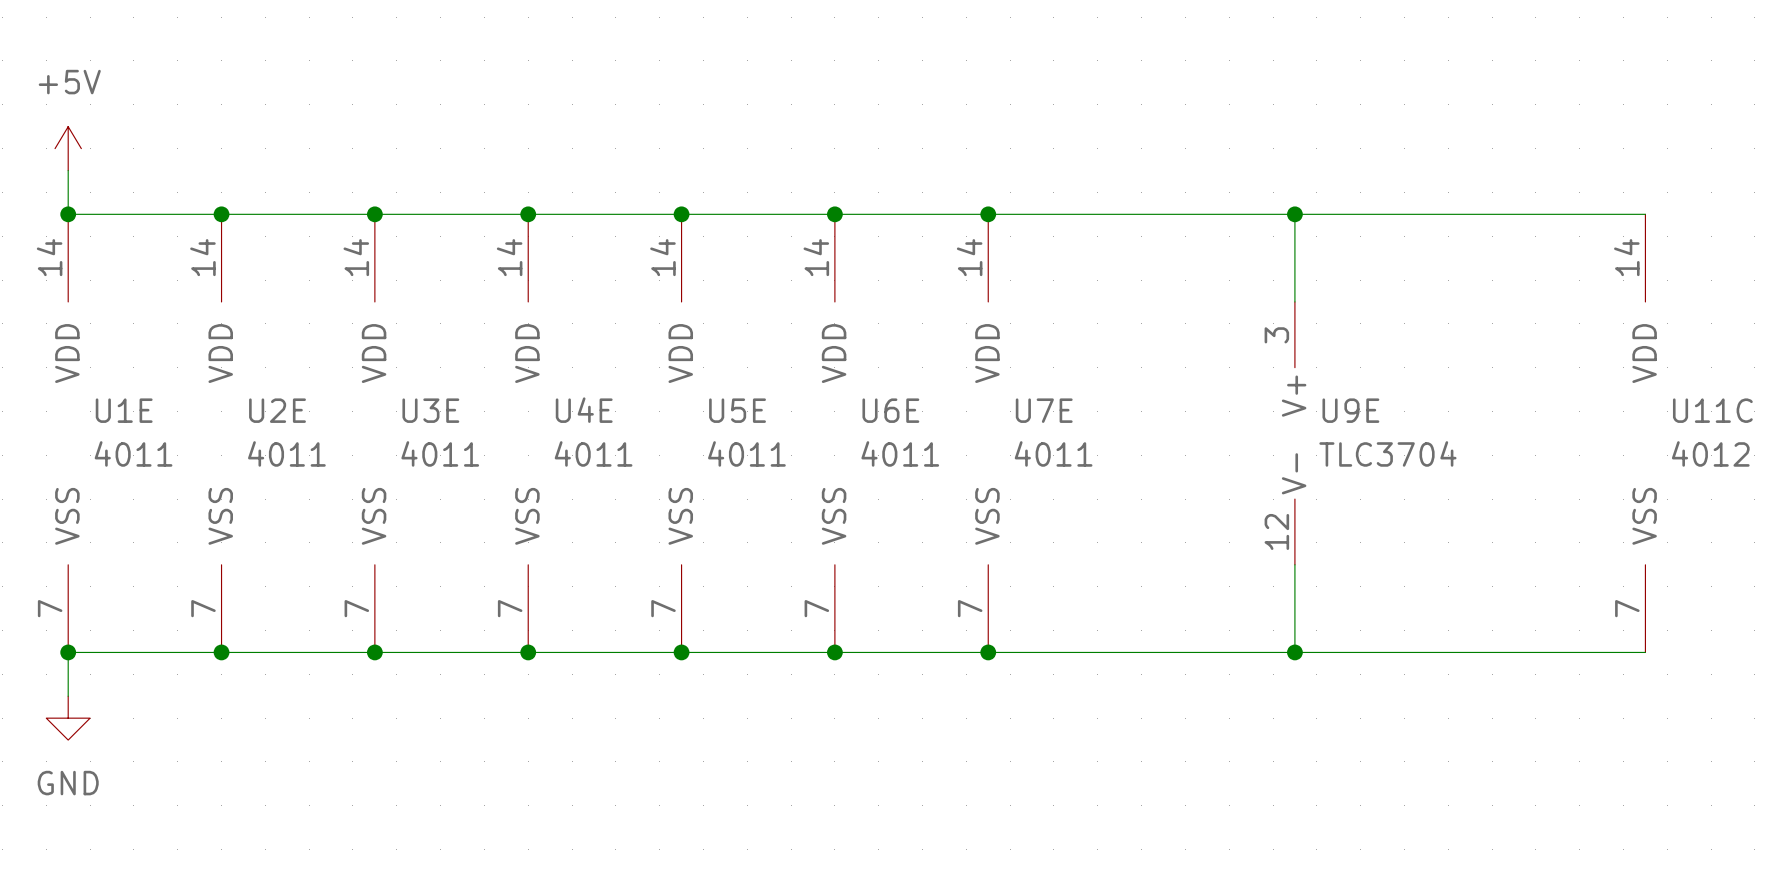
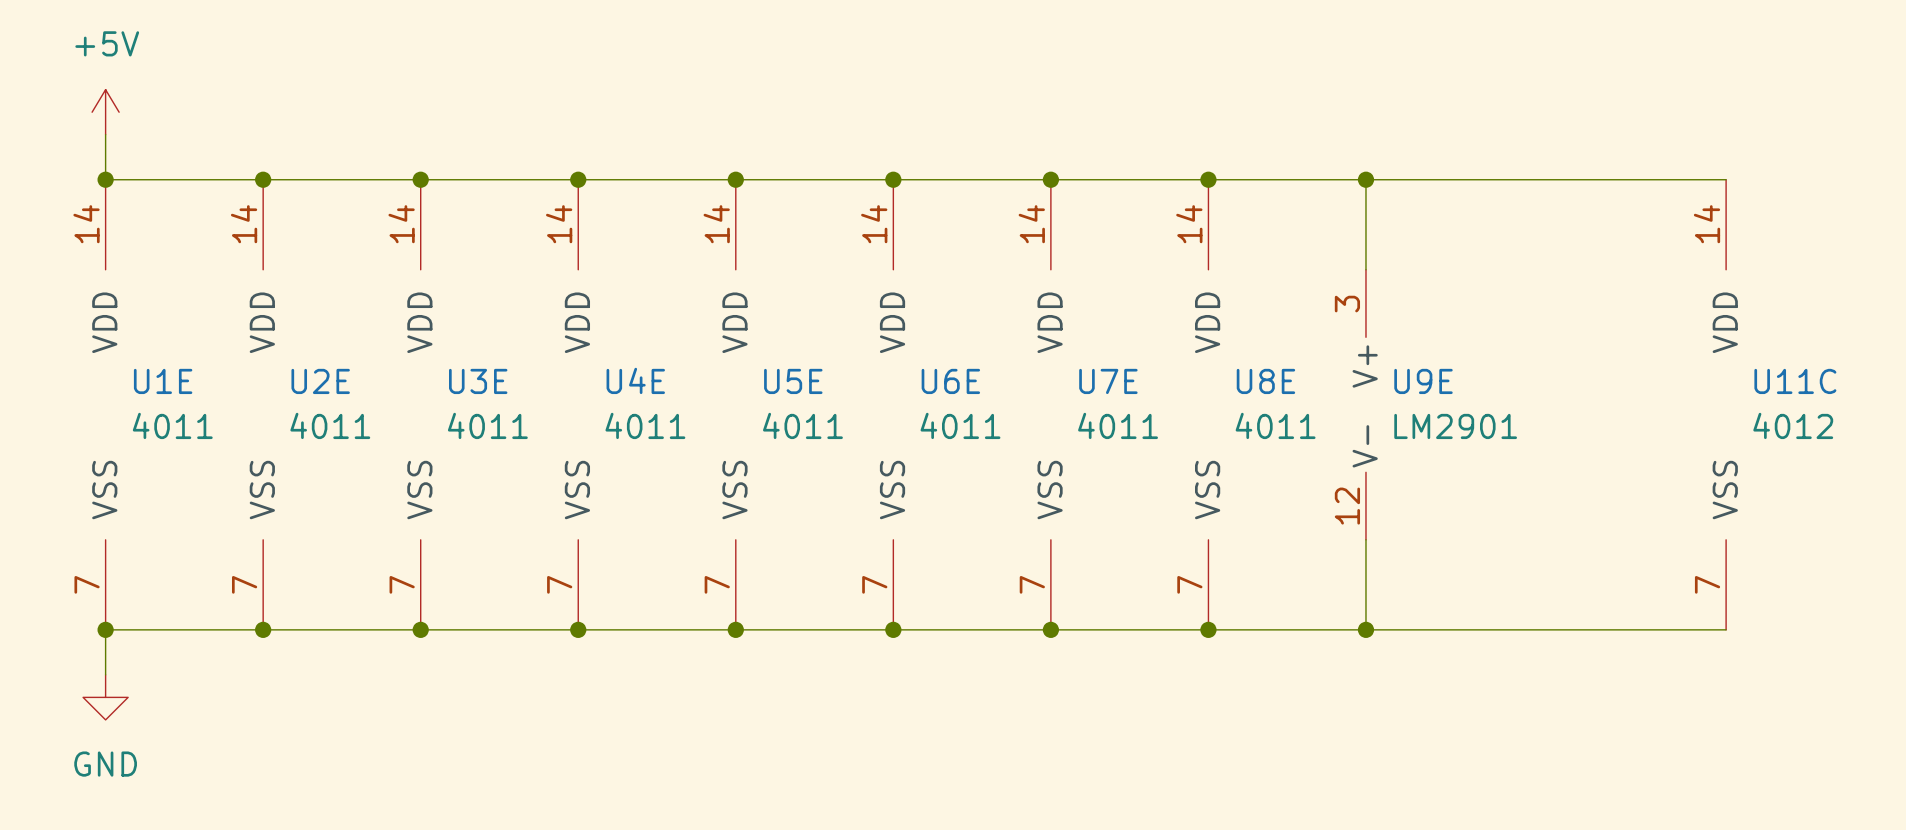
junction: none -> (1208, 179)
U8E: none -> 4011 (1208, 404)
U9E value: TLC3704 (1387, 453) -> LM2901 (1455, 426)
junction: none -> (1208, 629)

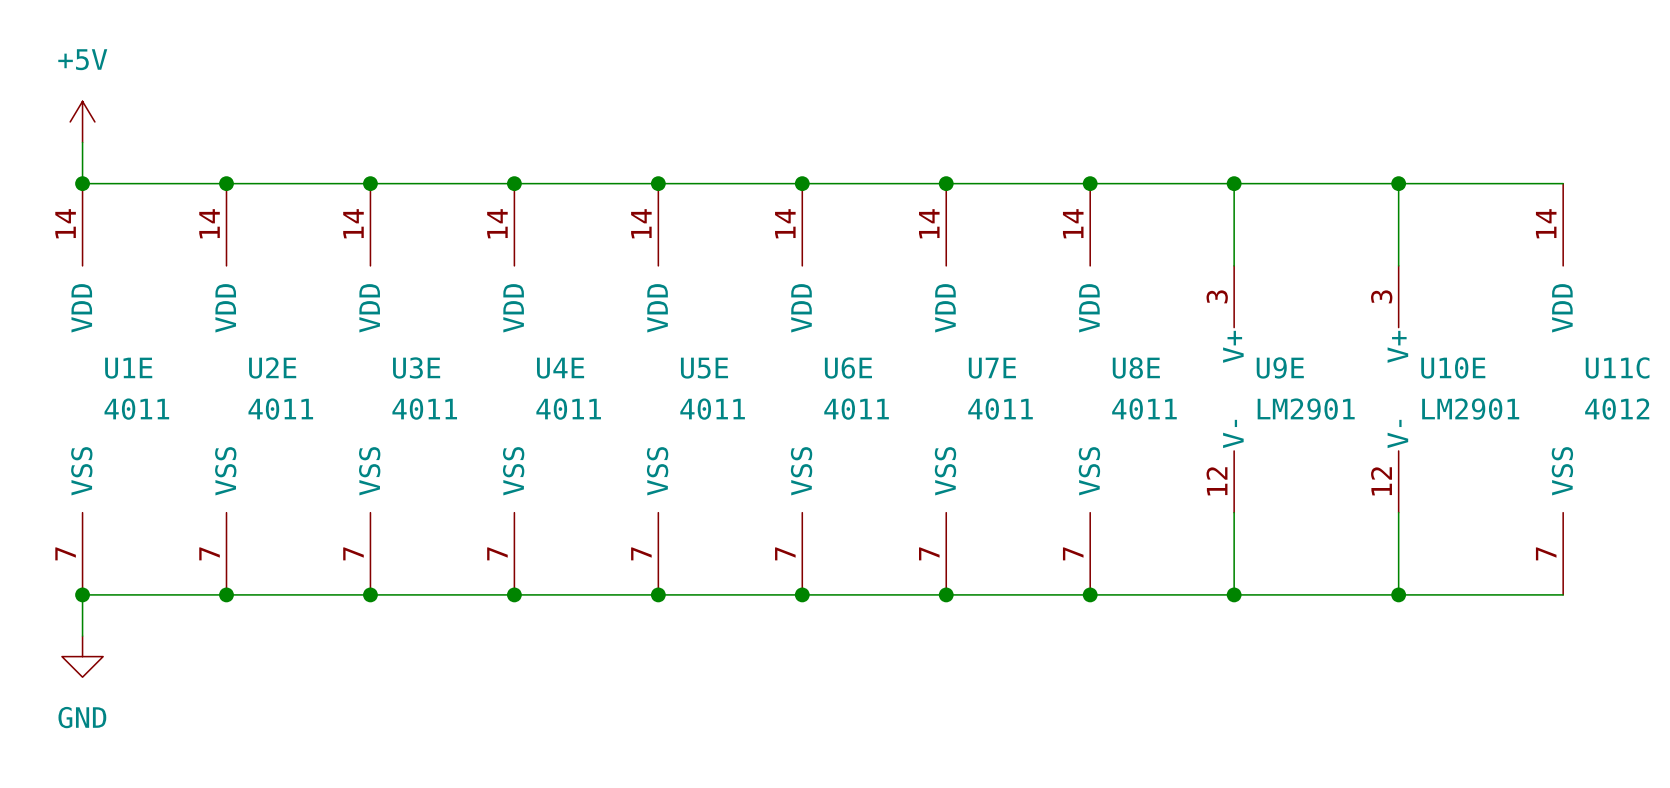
wire: none -> (1398, 183) (1398, 265)
junction: none -> (1398, 183)
U10E: none -> LM2901 (1398, 389)
wire: none -> (1398, 512) (1398, 594)
junction: none -> (1398, 594)

